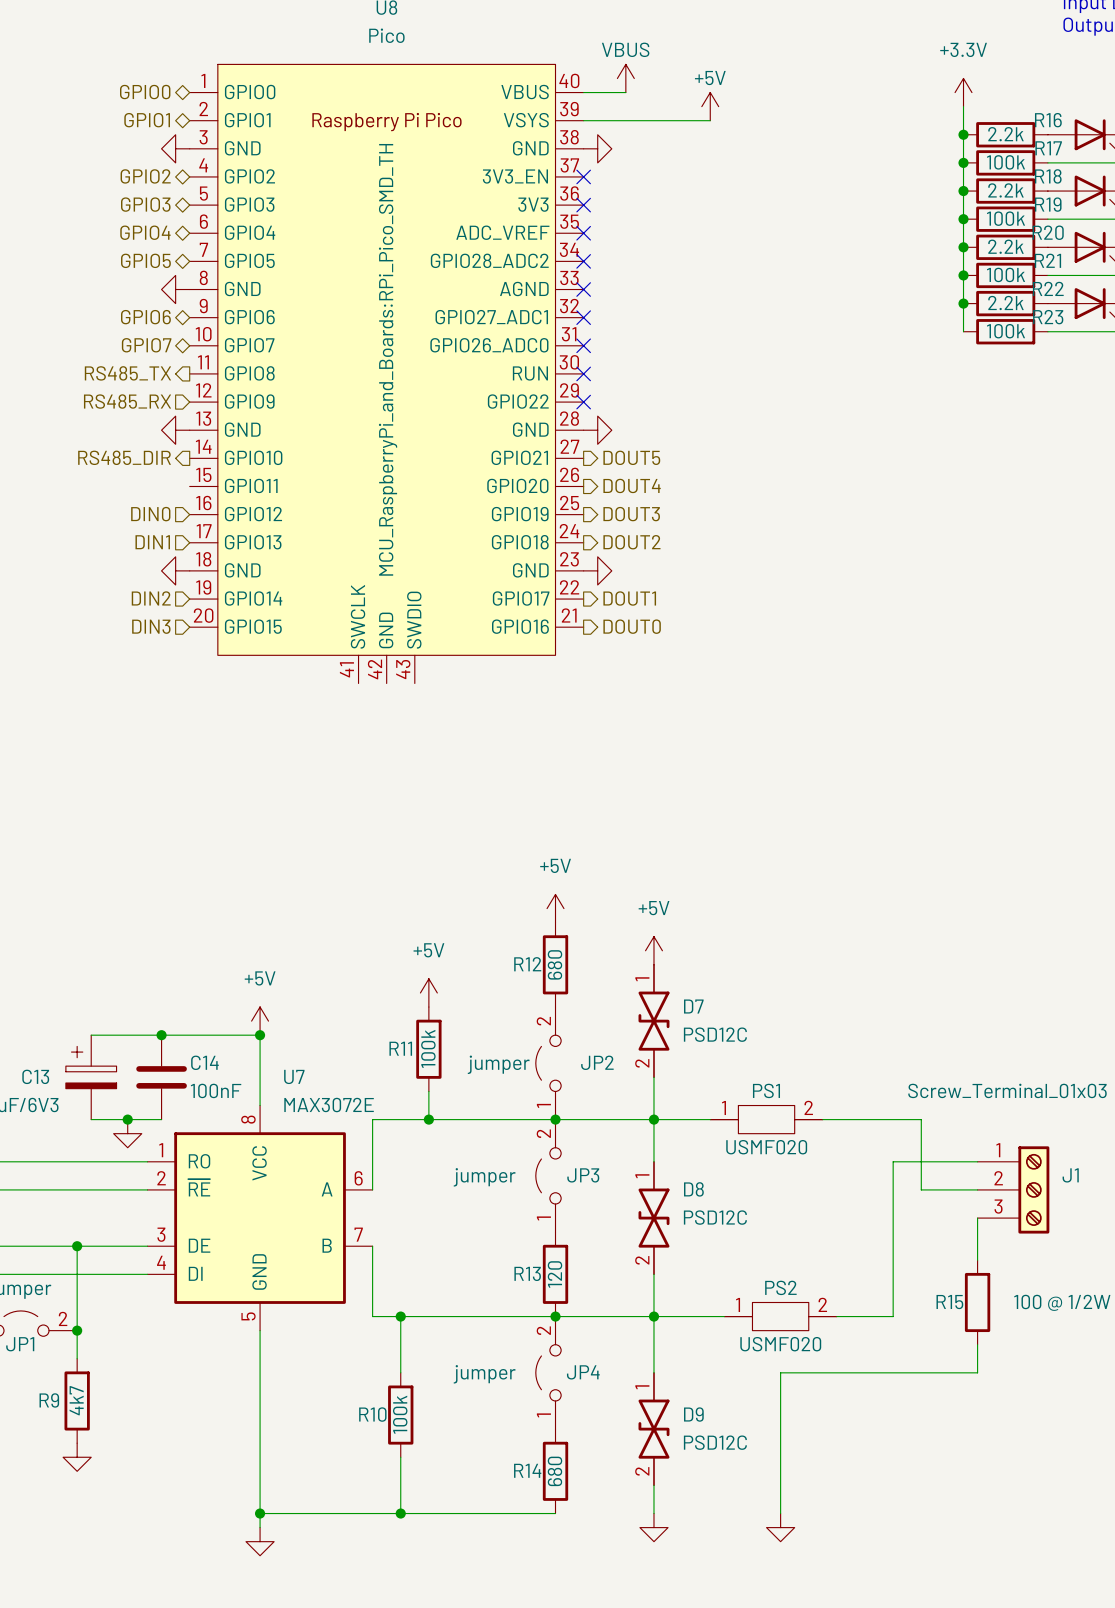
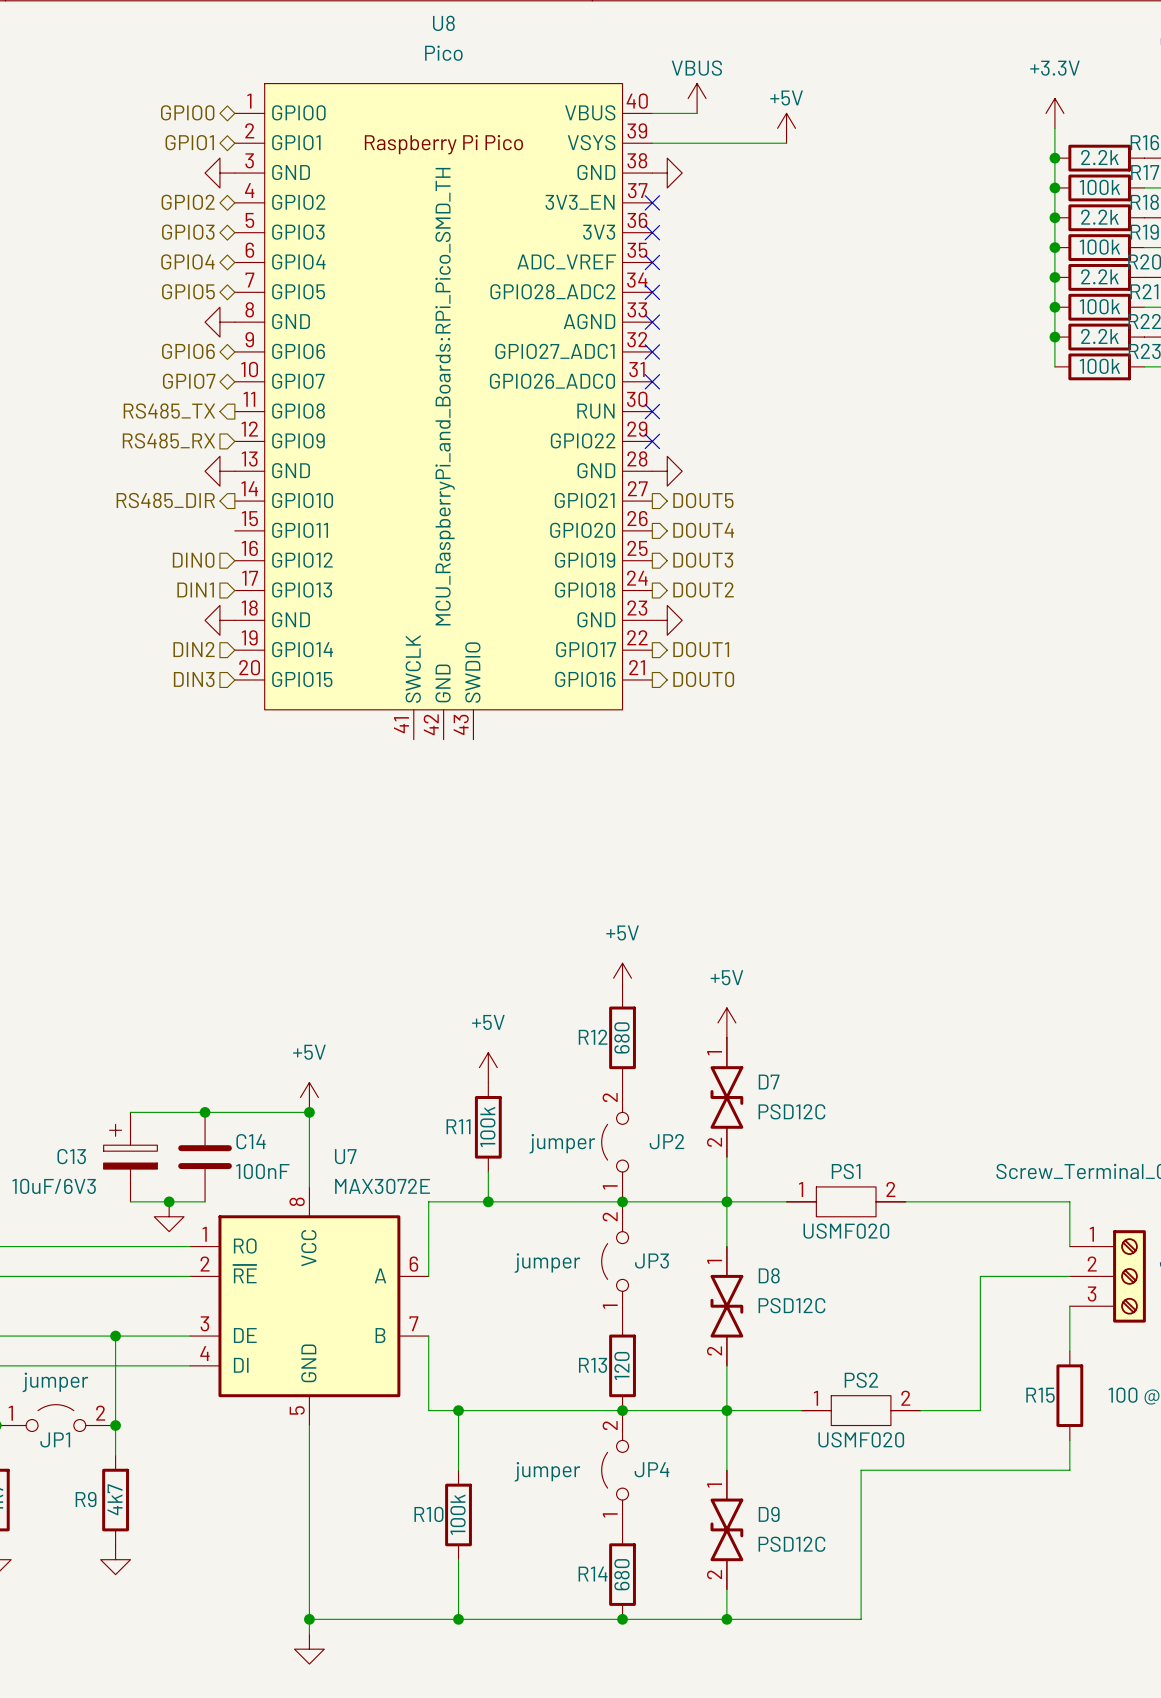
wire: (921, 1119) (921, 1189) -> (1010, 1201) (1069, 1201) (1069, 1246)
wire: (977, 1161) (893, 1161) (893, 1189) -> (1010, 1276) (980, 1276)
wire: none -> (622, 1619) (861, 1619)
junction: none -> (622, 1619)
junction: none -> (726, 1619)
power symbol: (653, 1527) -> none
power symbol: (780, 1527) -> none

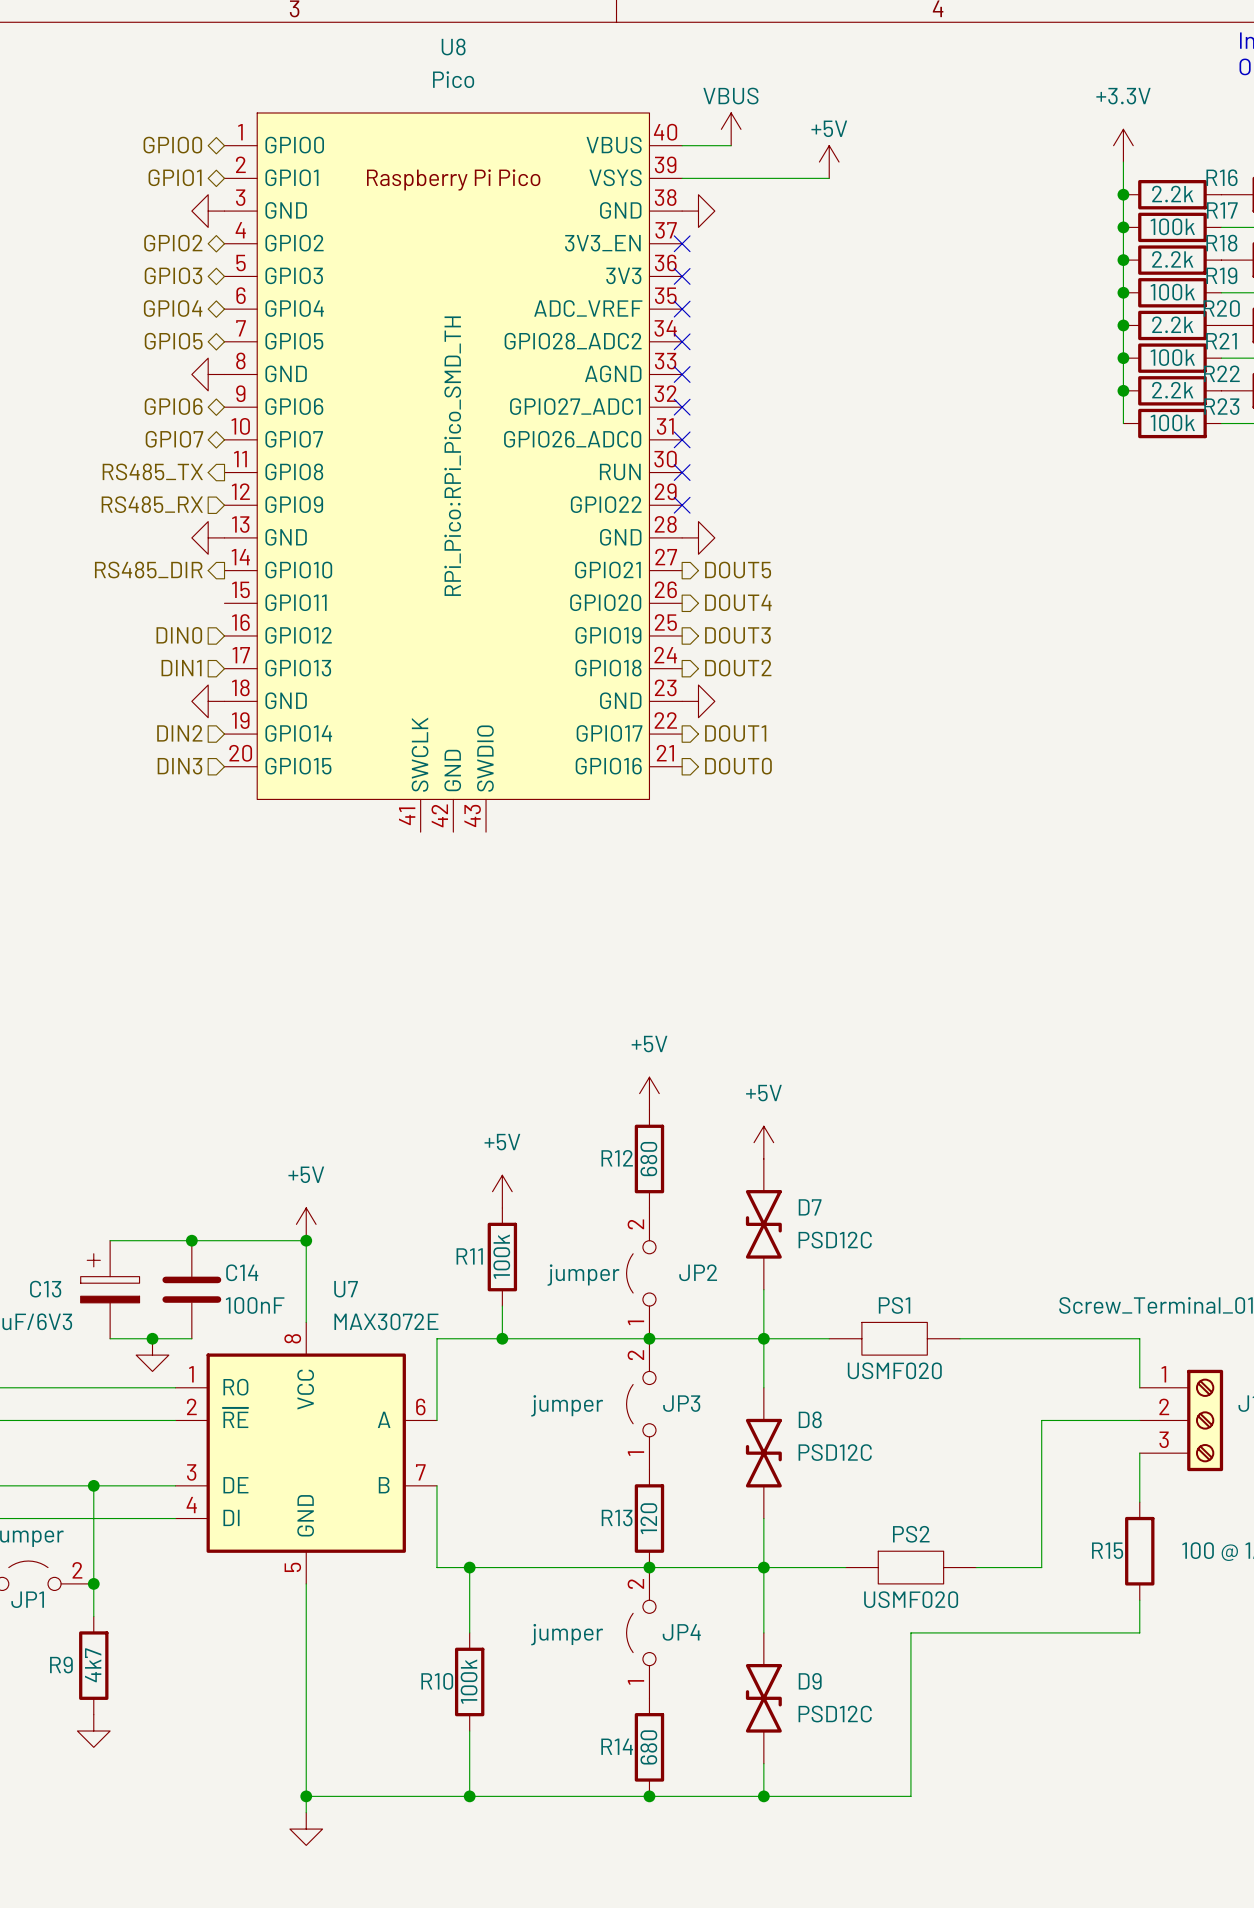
U8 text: MCU_RaspberryPi_and_Boards:RPi_Pico_SMD_TH (445, 396) -> RPi_Pico:RPi_Pico_SMD_TH (452, 456)
D7 symbol: [710, 1037, 744, 1158] -> [745, 1158, 782, 1290]
PS1 symbol: [786, 1186, 906, 1217] -> [829, 1322, 960, 1356]
D8 symbol: [710, 1246, 744, 1366] -> [745, 1387, 782, 1519]
PS2 symbol: [801, 1395, 921, 1426] -> [845, 1551, 977, 1584]
D9 symbol: [710, 1470, 744, 1590] -> [745, 1632, 782, 1764]

